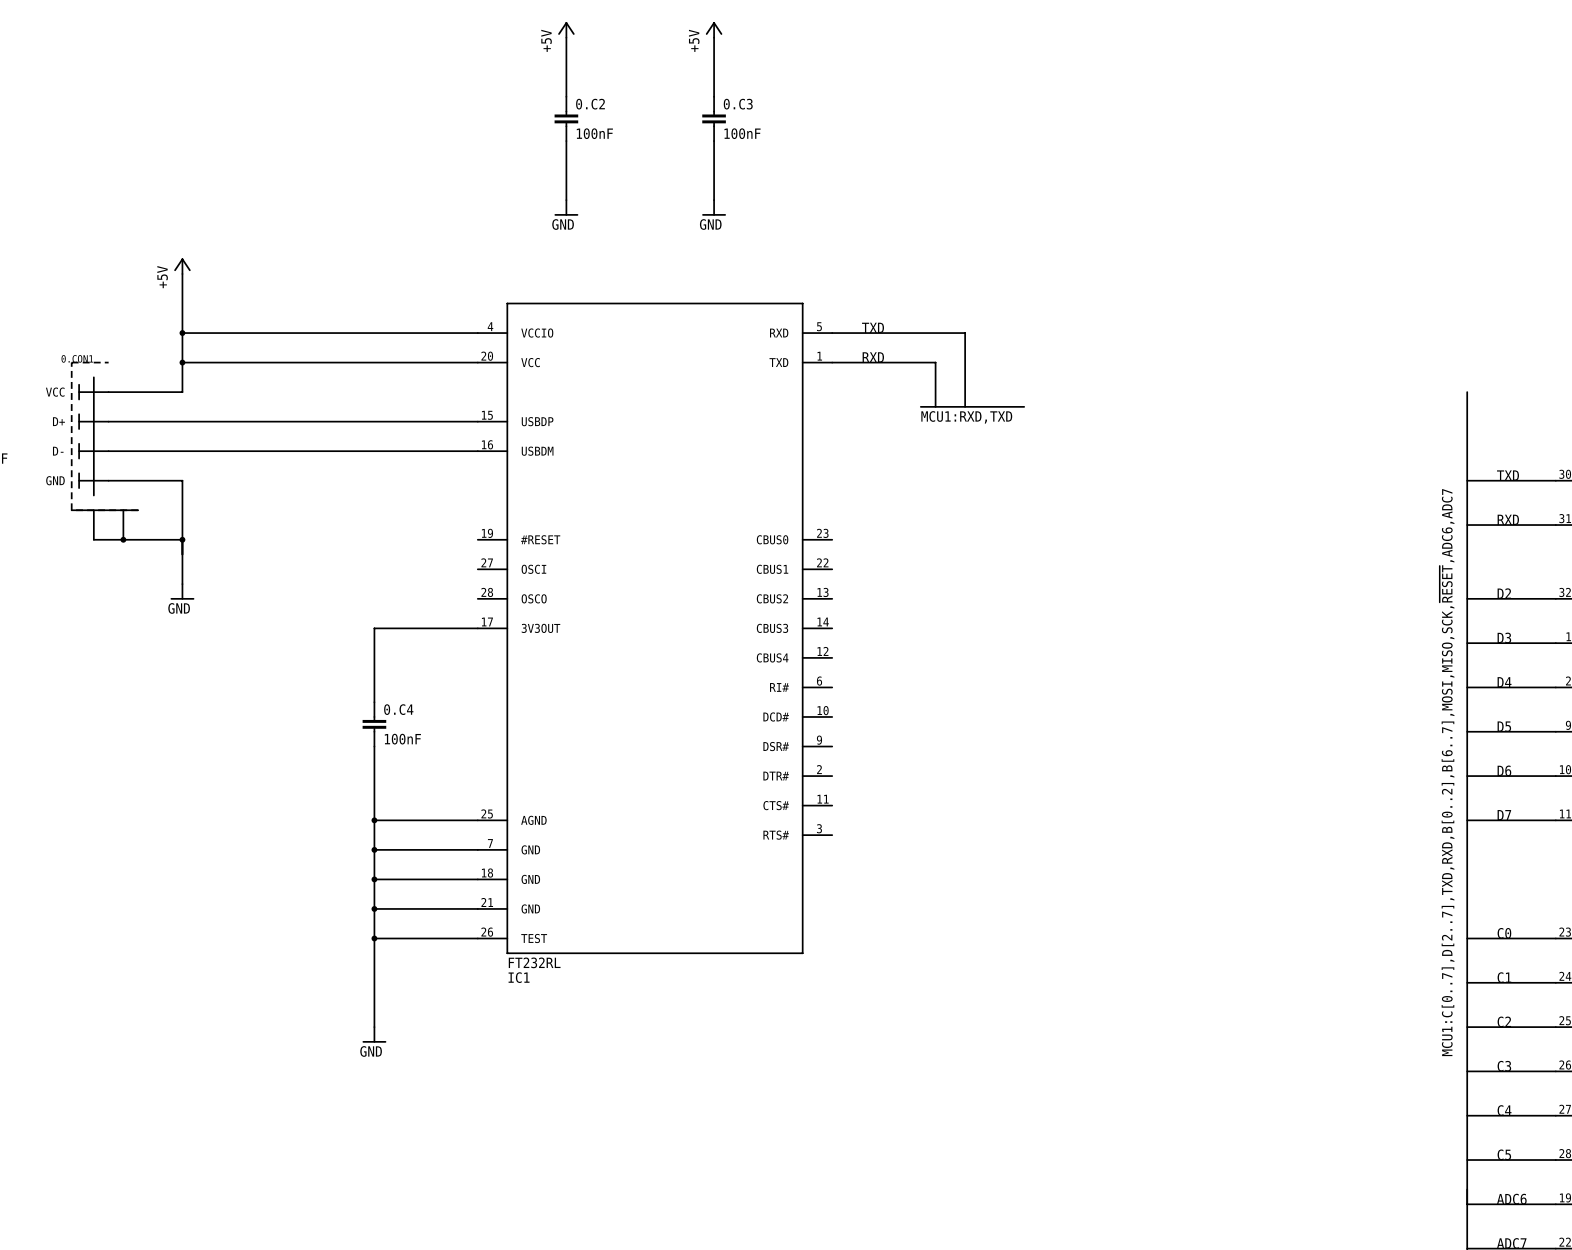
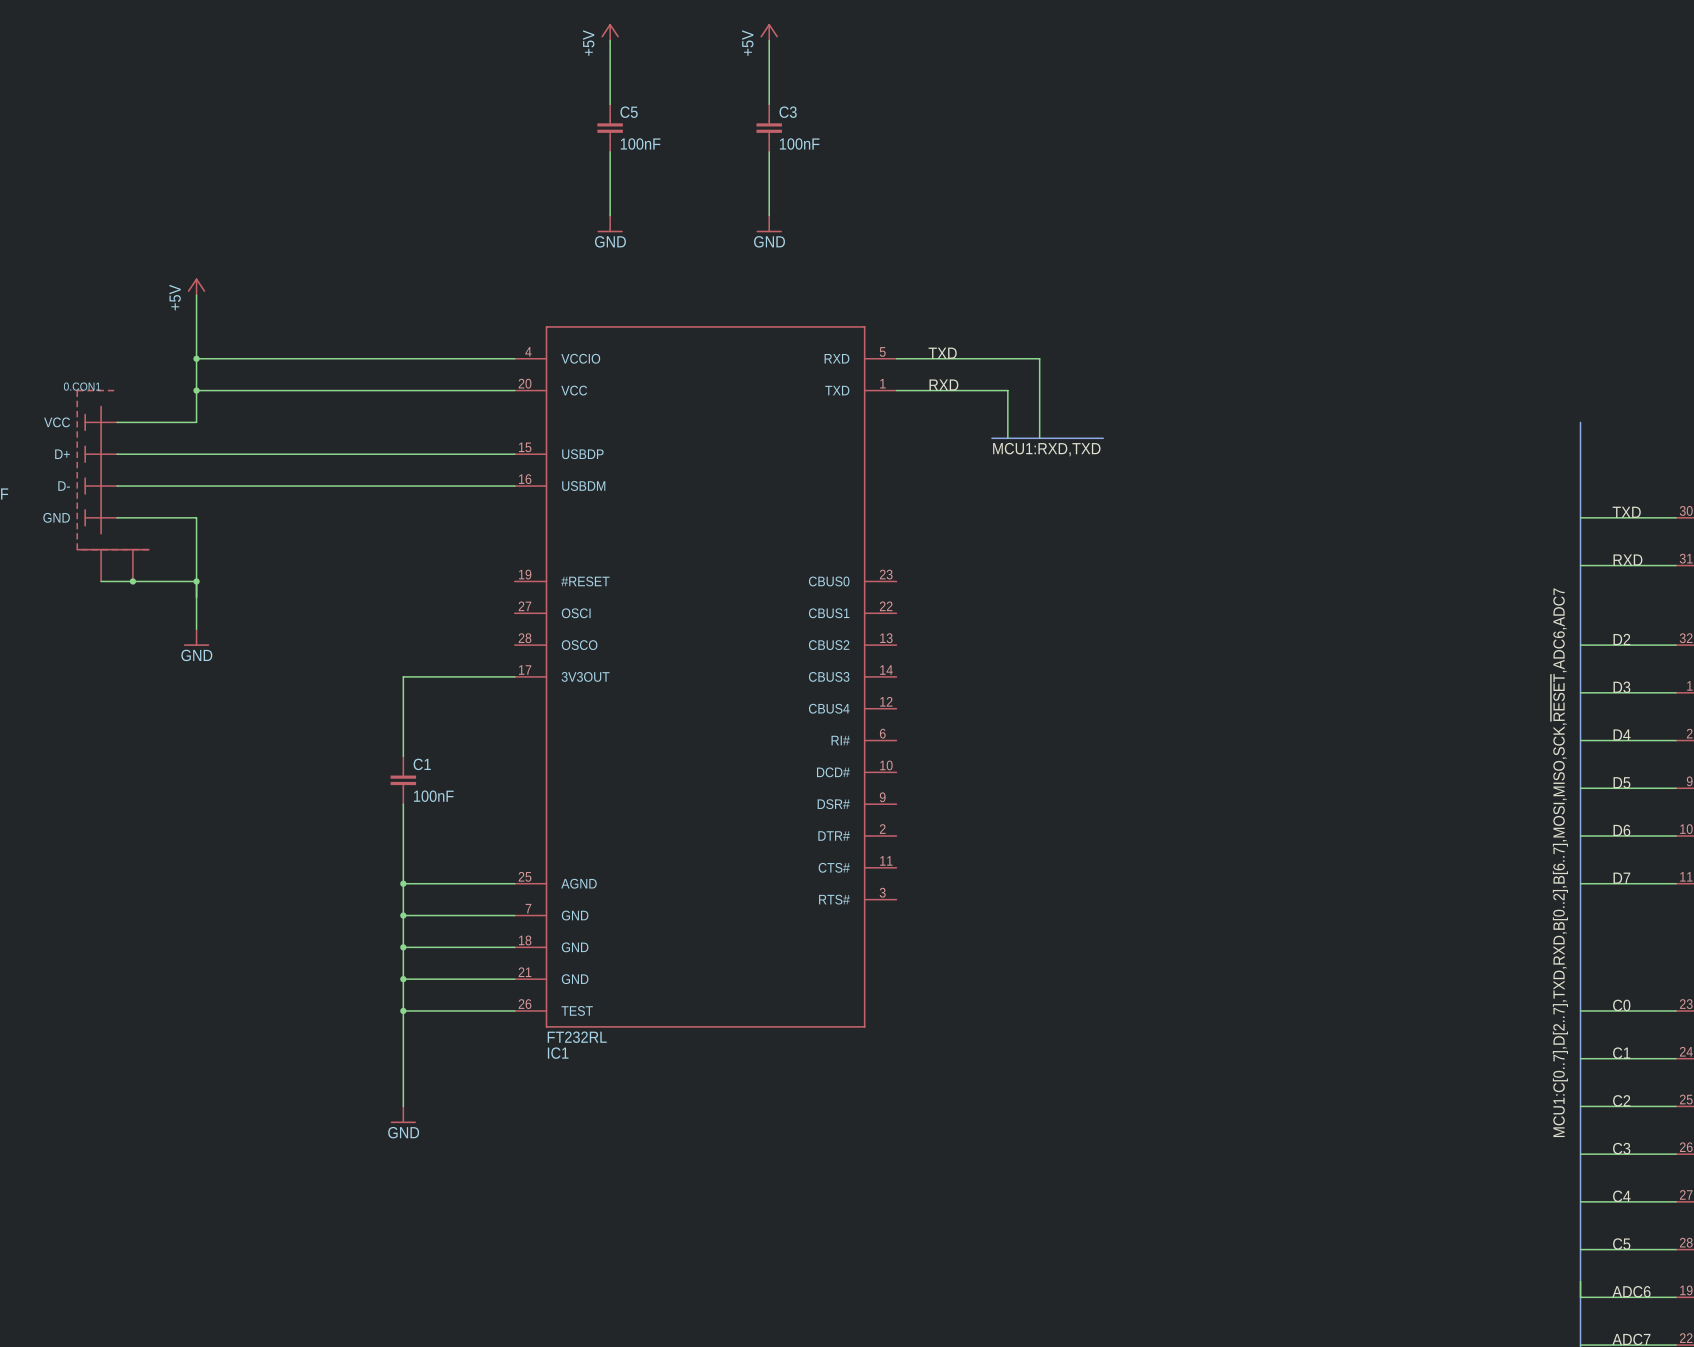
0.C2 name: 0.C2 (590, 104) -> C5 (629, 112)
0.C3 name: 0.C3 (738, 104) -> C3 (788, 112)
0.C4 name: 0.C4 (398, 709) -> C1 (422, 764)

